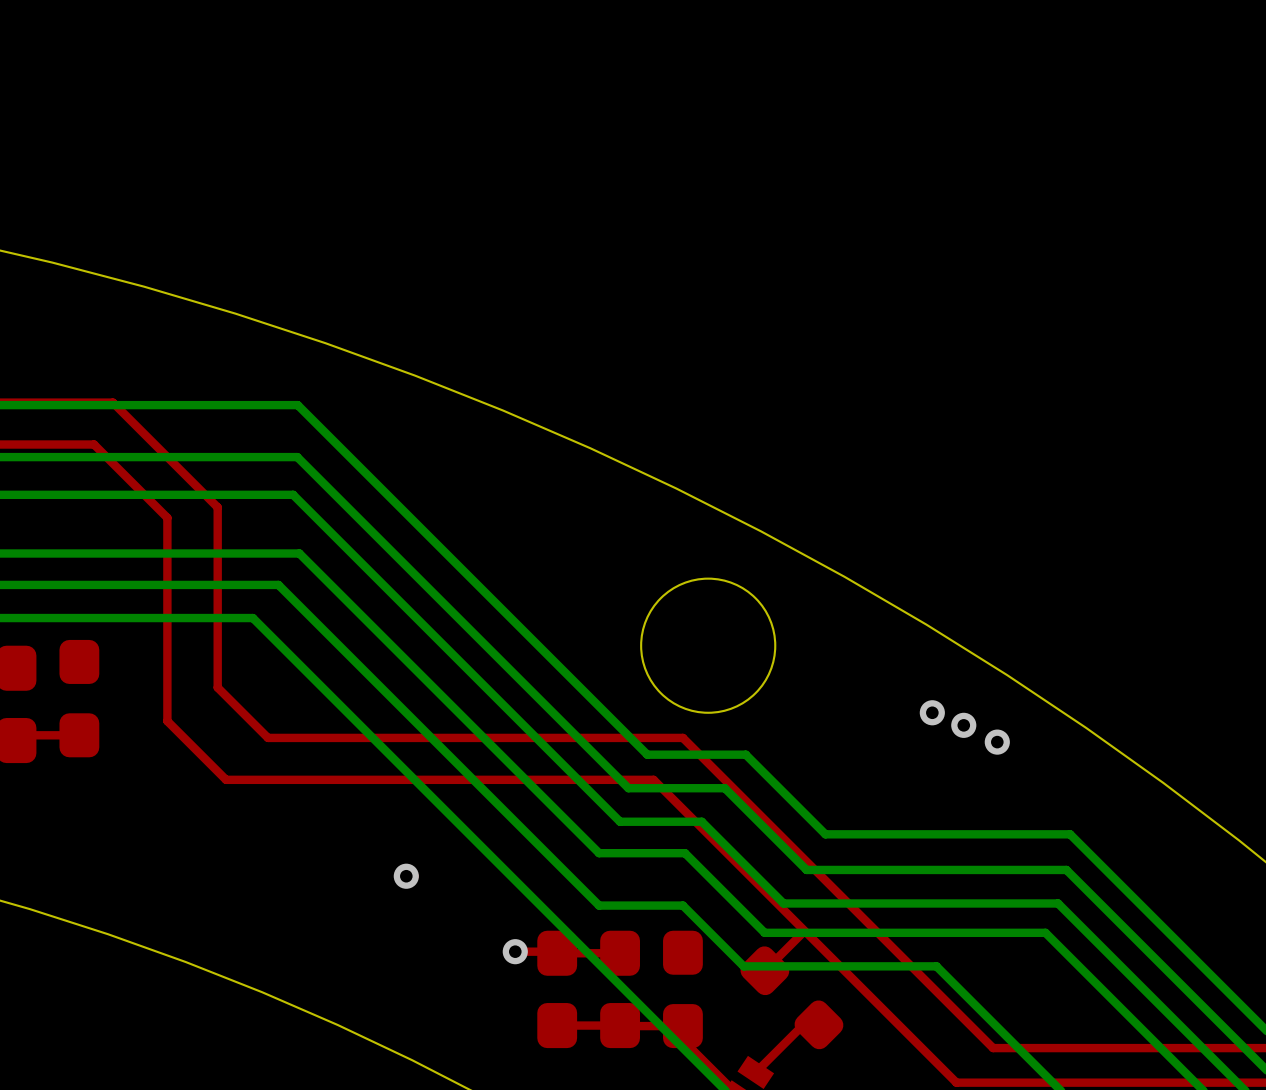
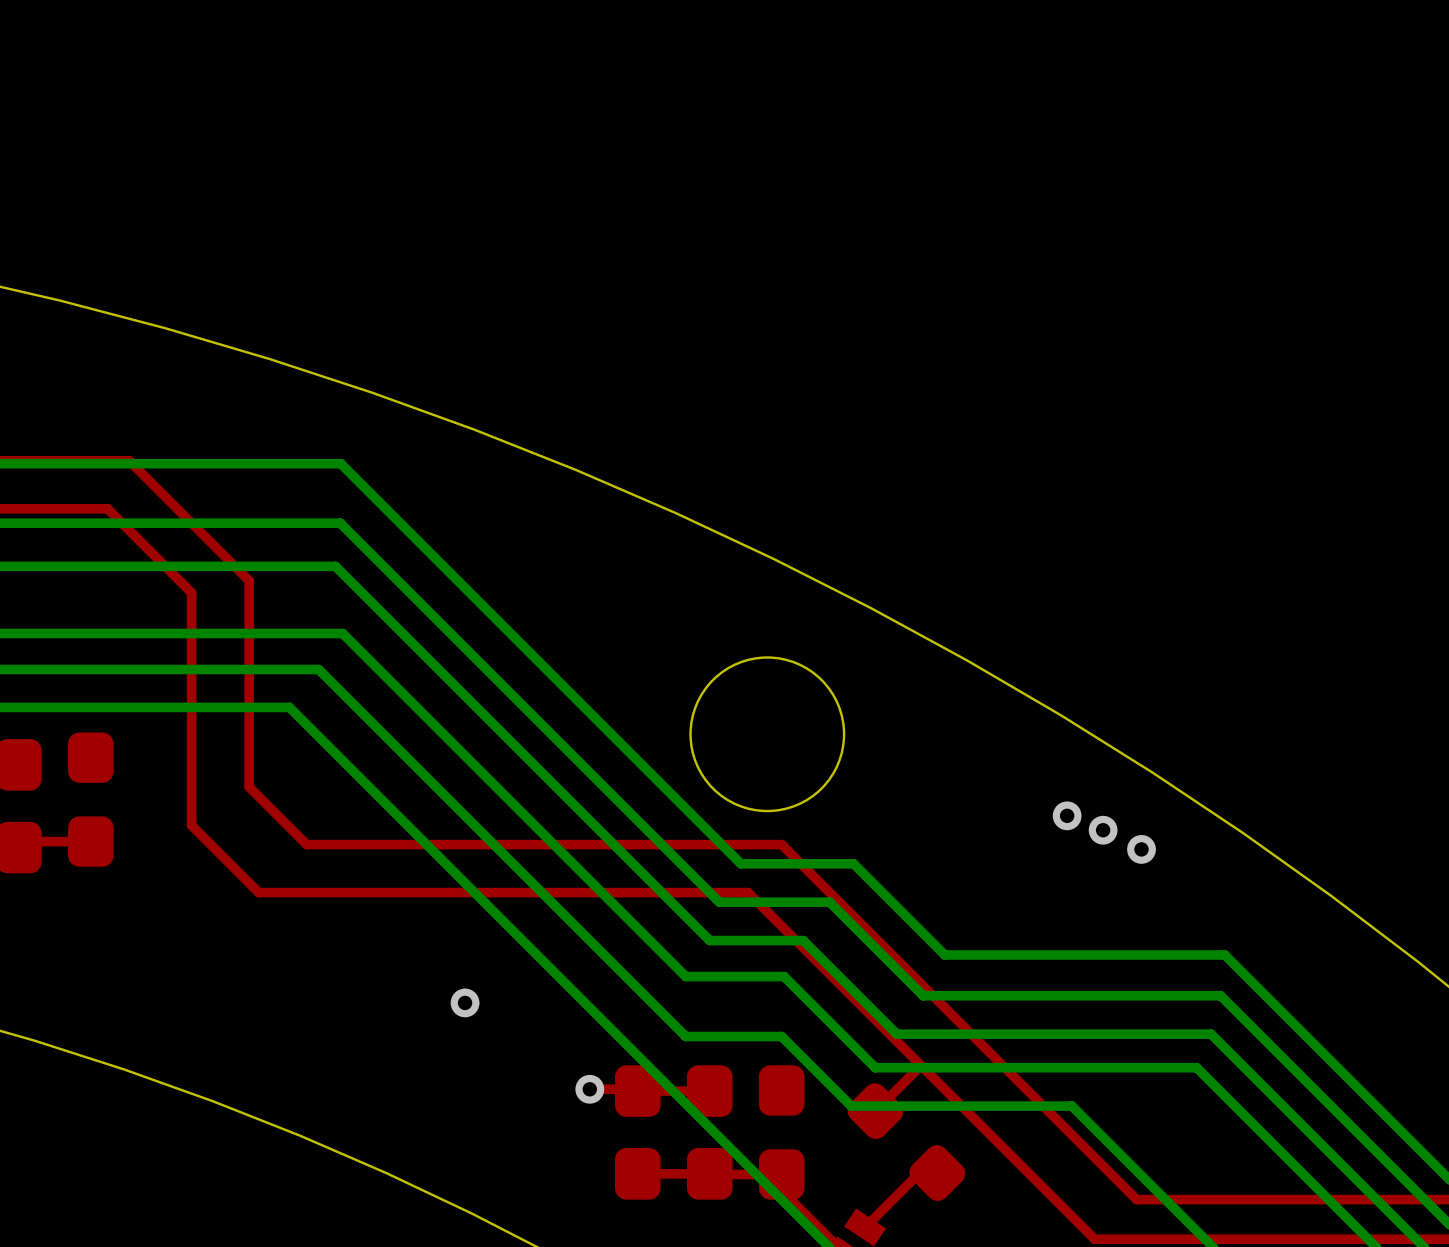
round board edge position: (708, 645) -> (767, 734)

